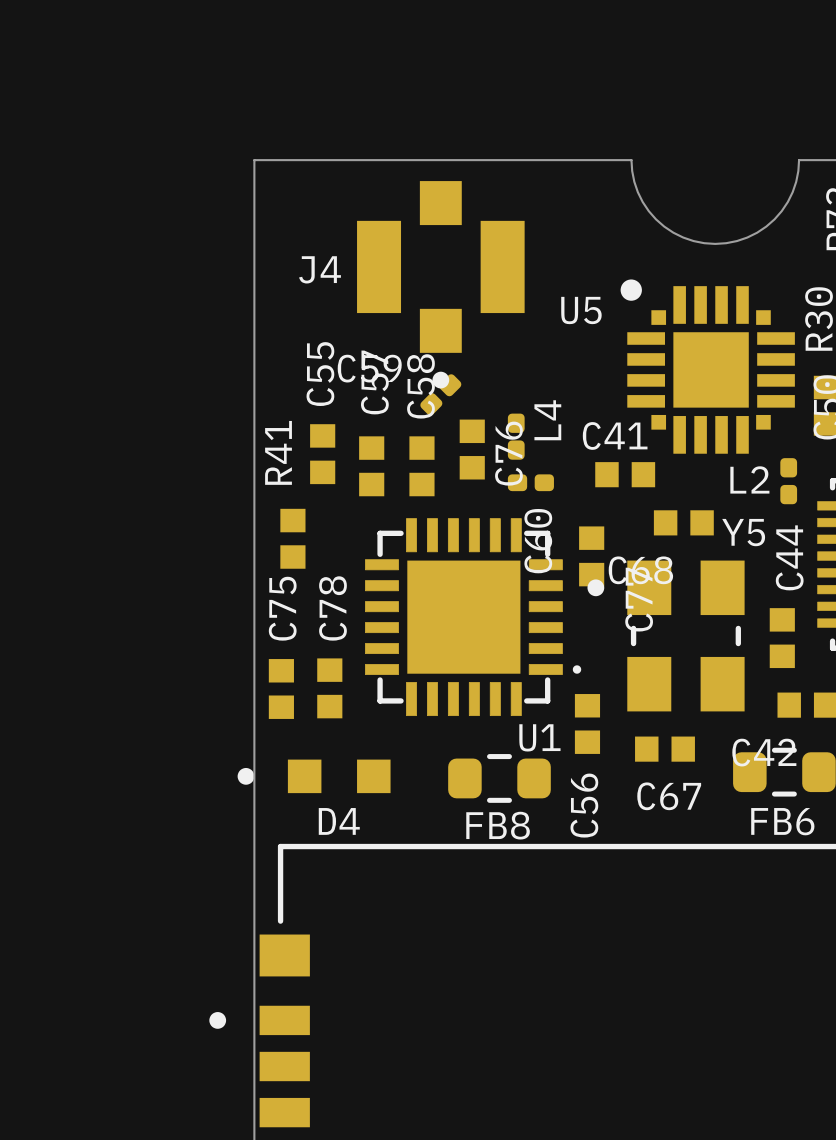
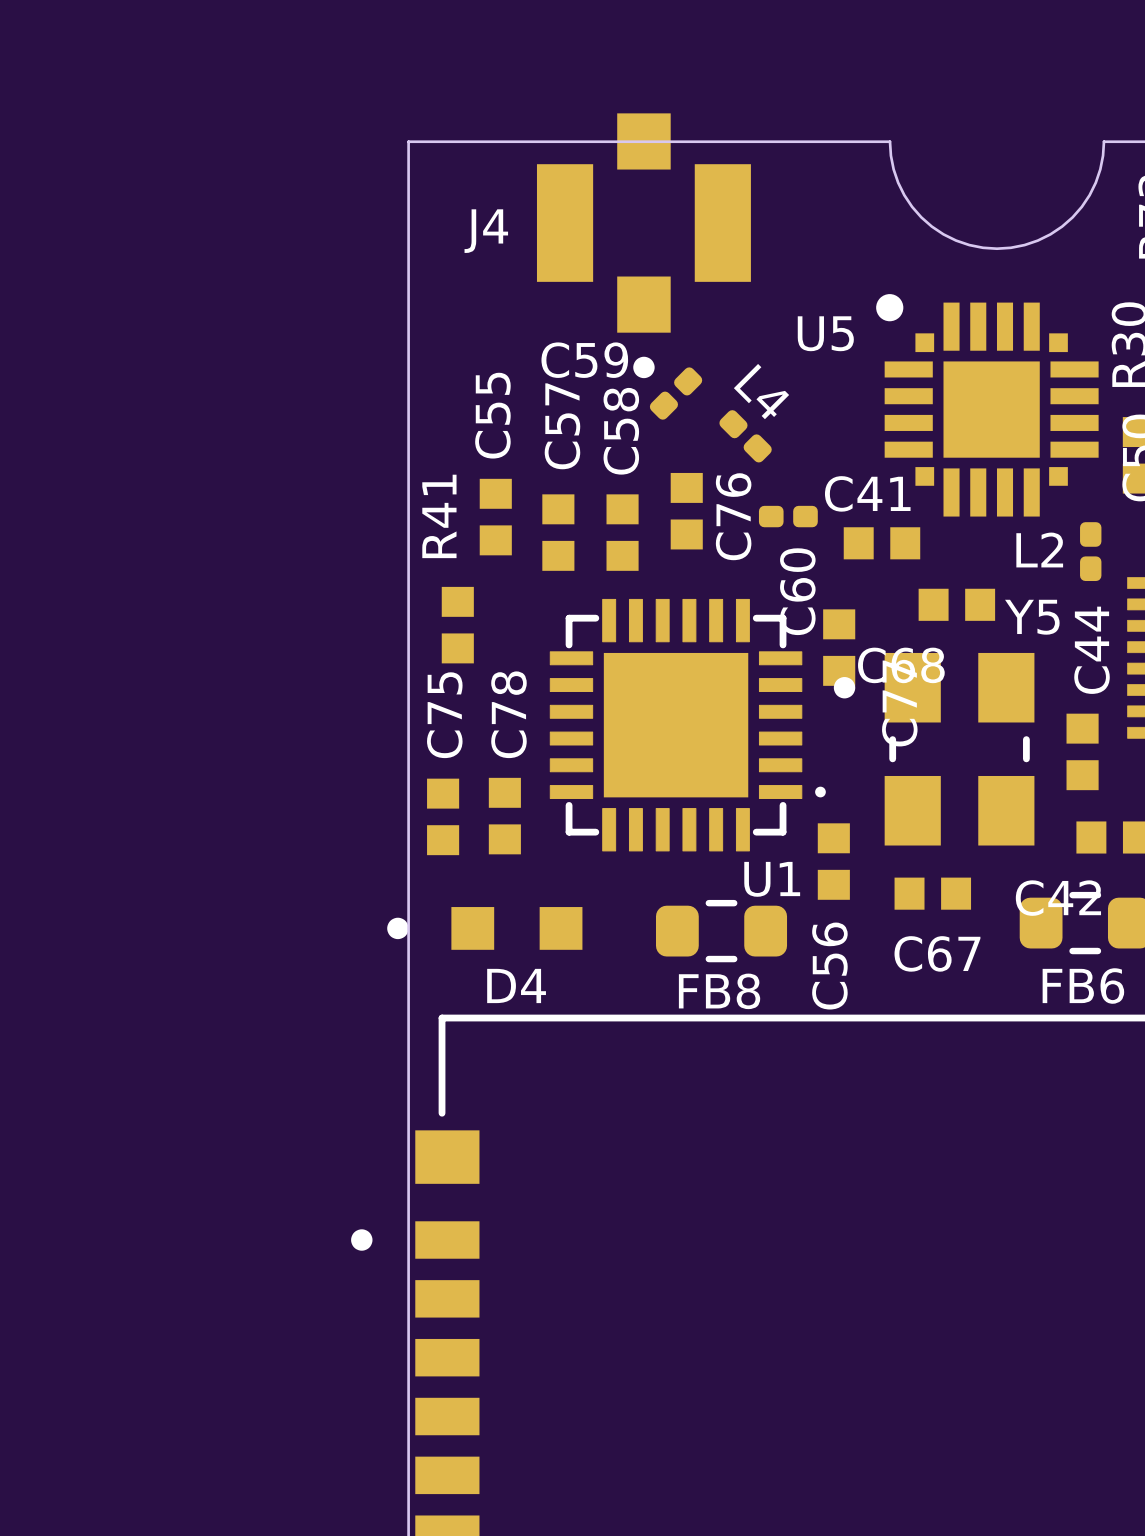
J4 position: (440, 284) -> (643, 245)
C59 position: (440, 394) -> (676, 393)
L4 rotation: 0° (516, 436) -> 45° counterclockwise (745, 436)
L4 position: (516, 436) -> (745, 436)
C60 position: (530, 482) -> (788, 516)

